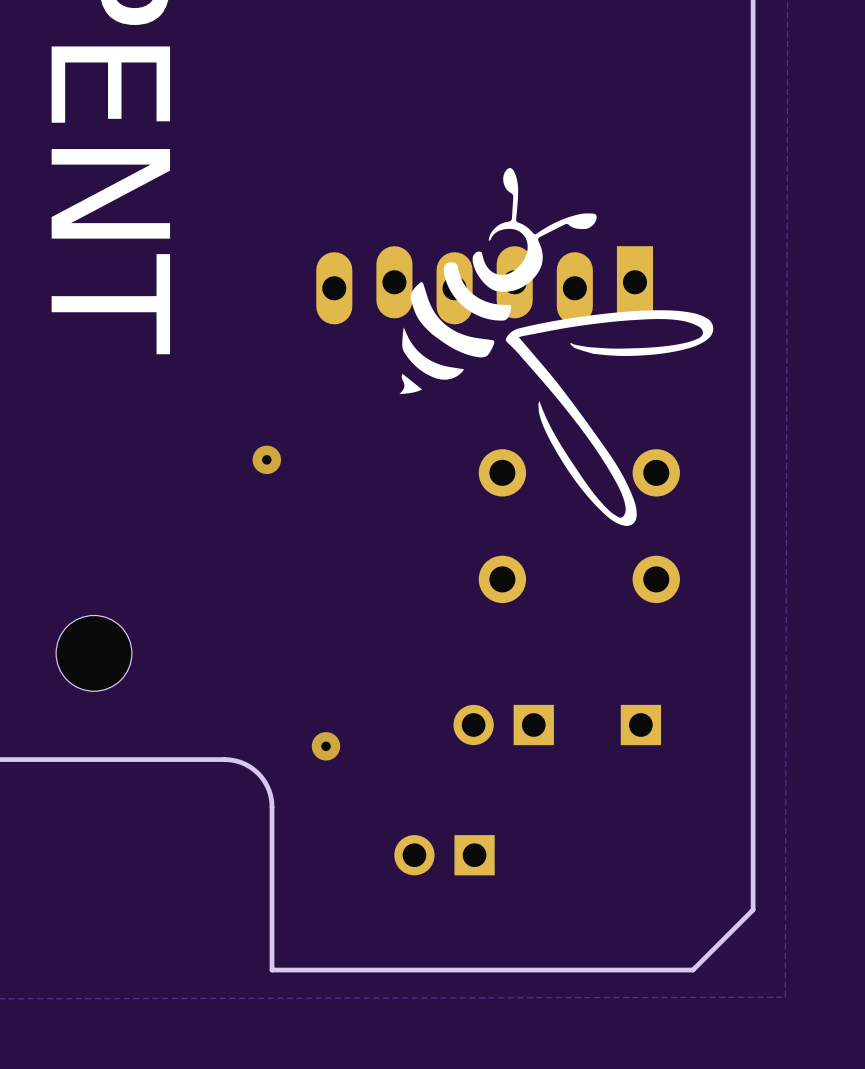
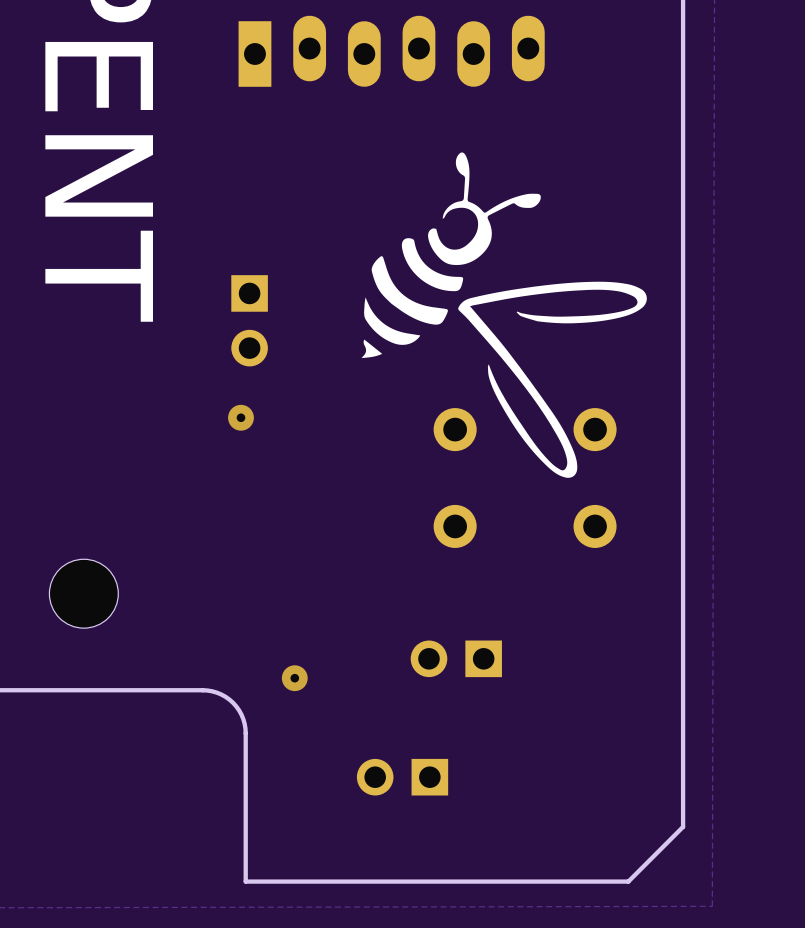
part rotation: 0° (484, 285) -> 180° (391, 51)
part position: (484, 285) -> (391, 51)
part: none -> (249, 320)
part: (640, 724) -> none

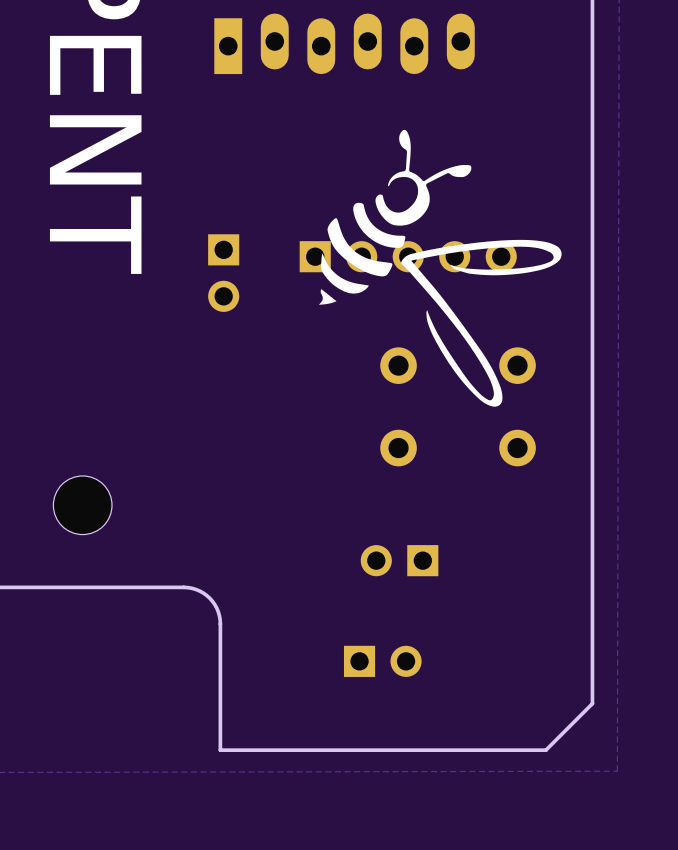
part: none -> (408, 256)
via: (240, 417) -> none
via: (294, 678) -> none
part rotation: 0° (402, 777) -> 180° (382, 661)

